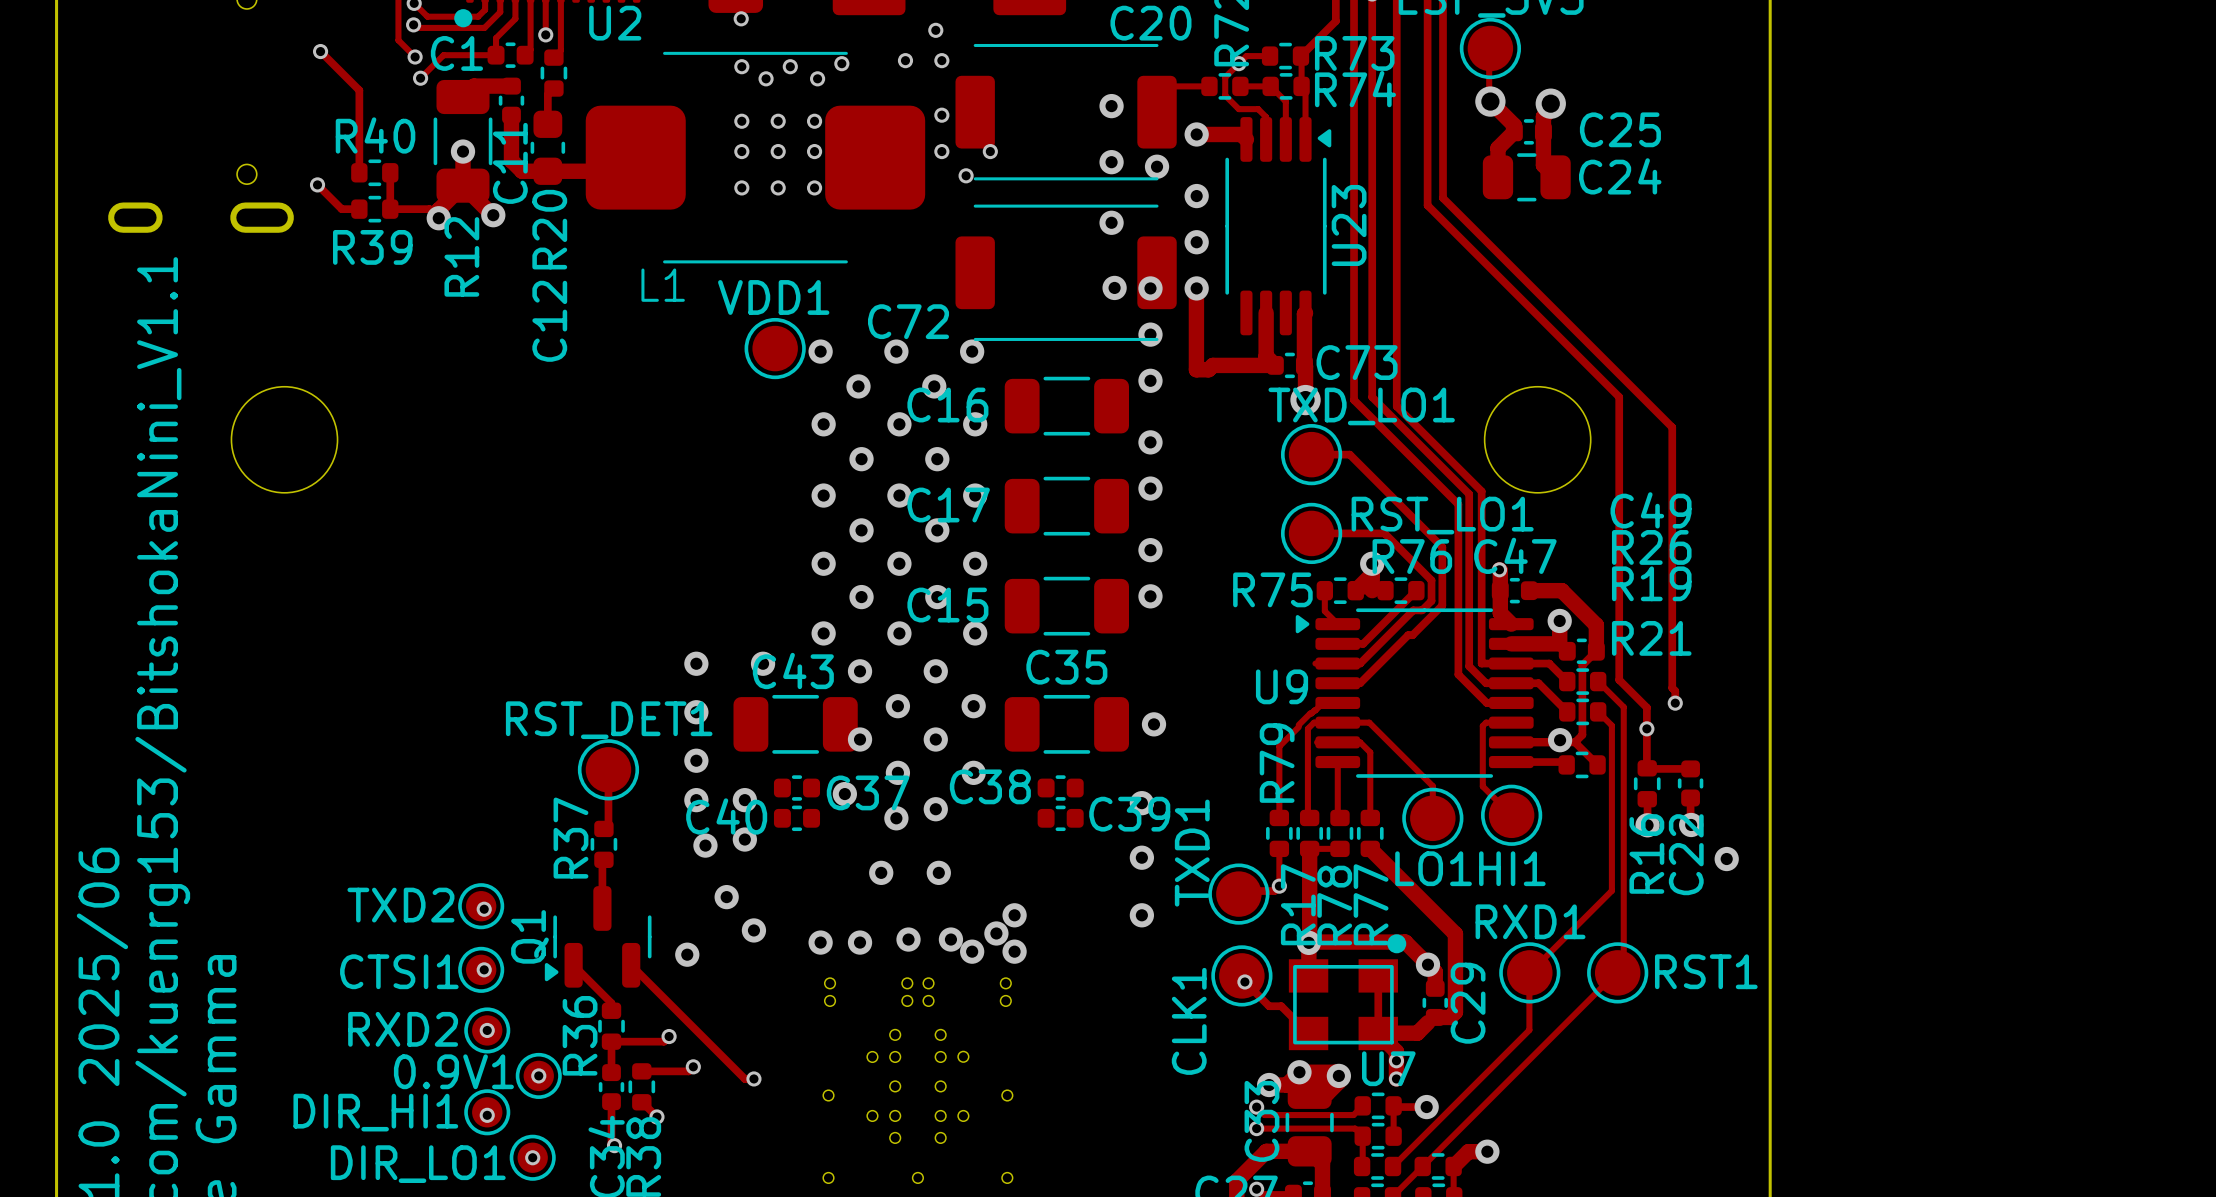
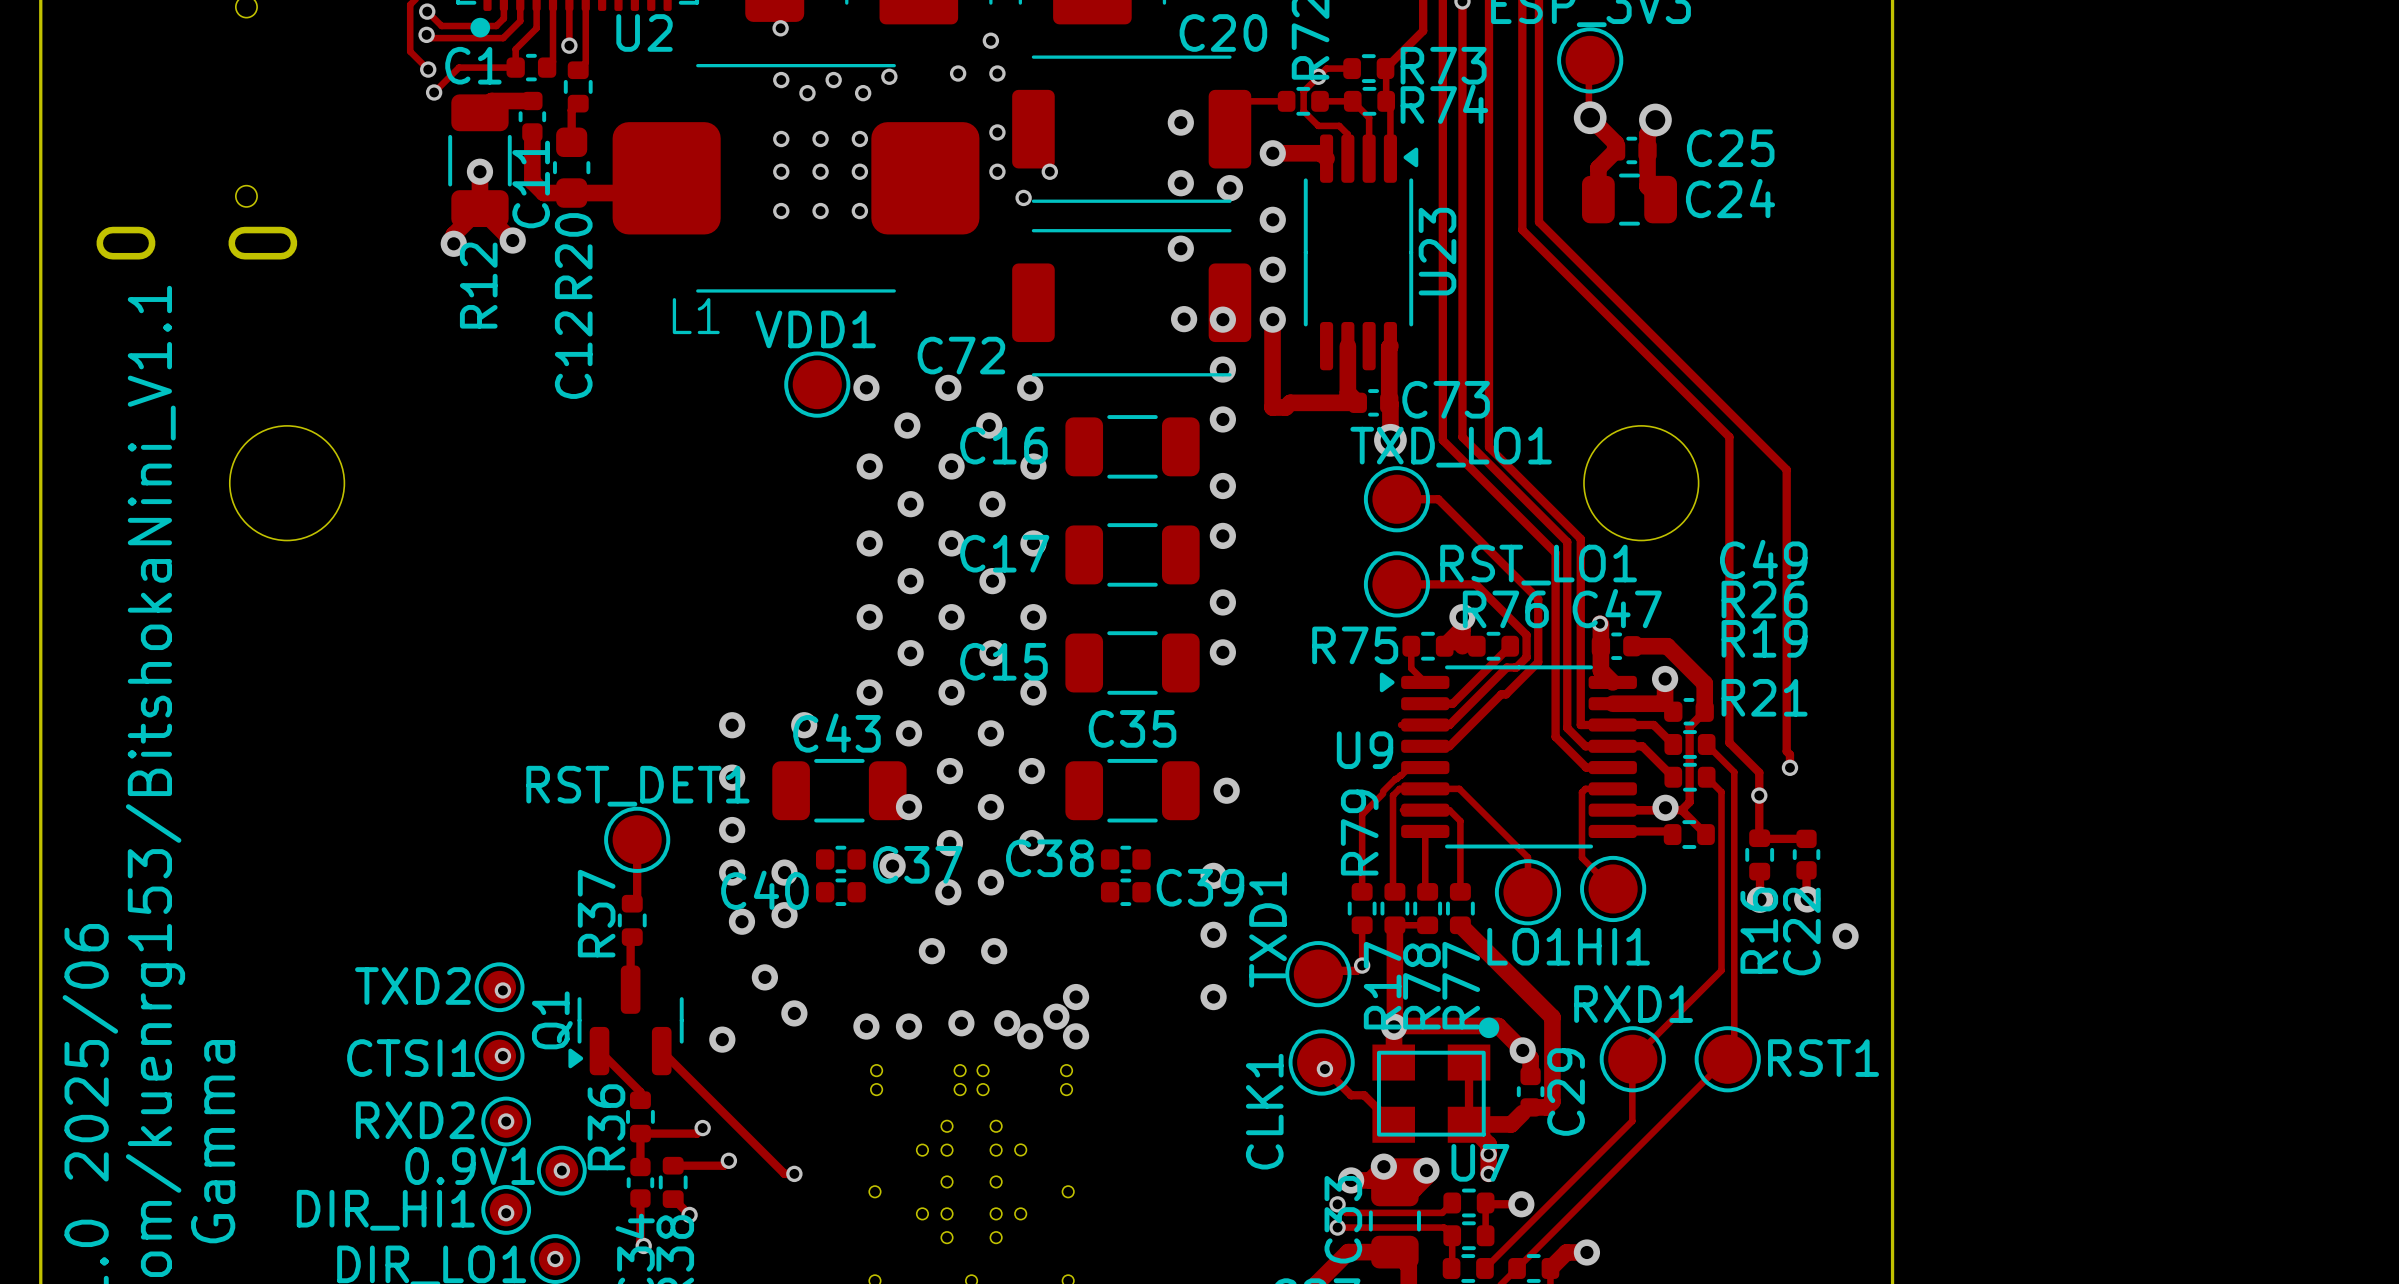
track: (320, 51) (359, 90) (359, 172) -> none
via: (320, 51) -> none
R40: (374, 172) -> none
track: (390, 172) (390, 209) (429, 209) (438, 218) -> none
track: (314, 184) (317, 184) (341, 209) (359, 209) -> none
via: (317, 184) -> none
R39: (374, 209) -> none

